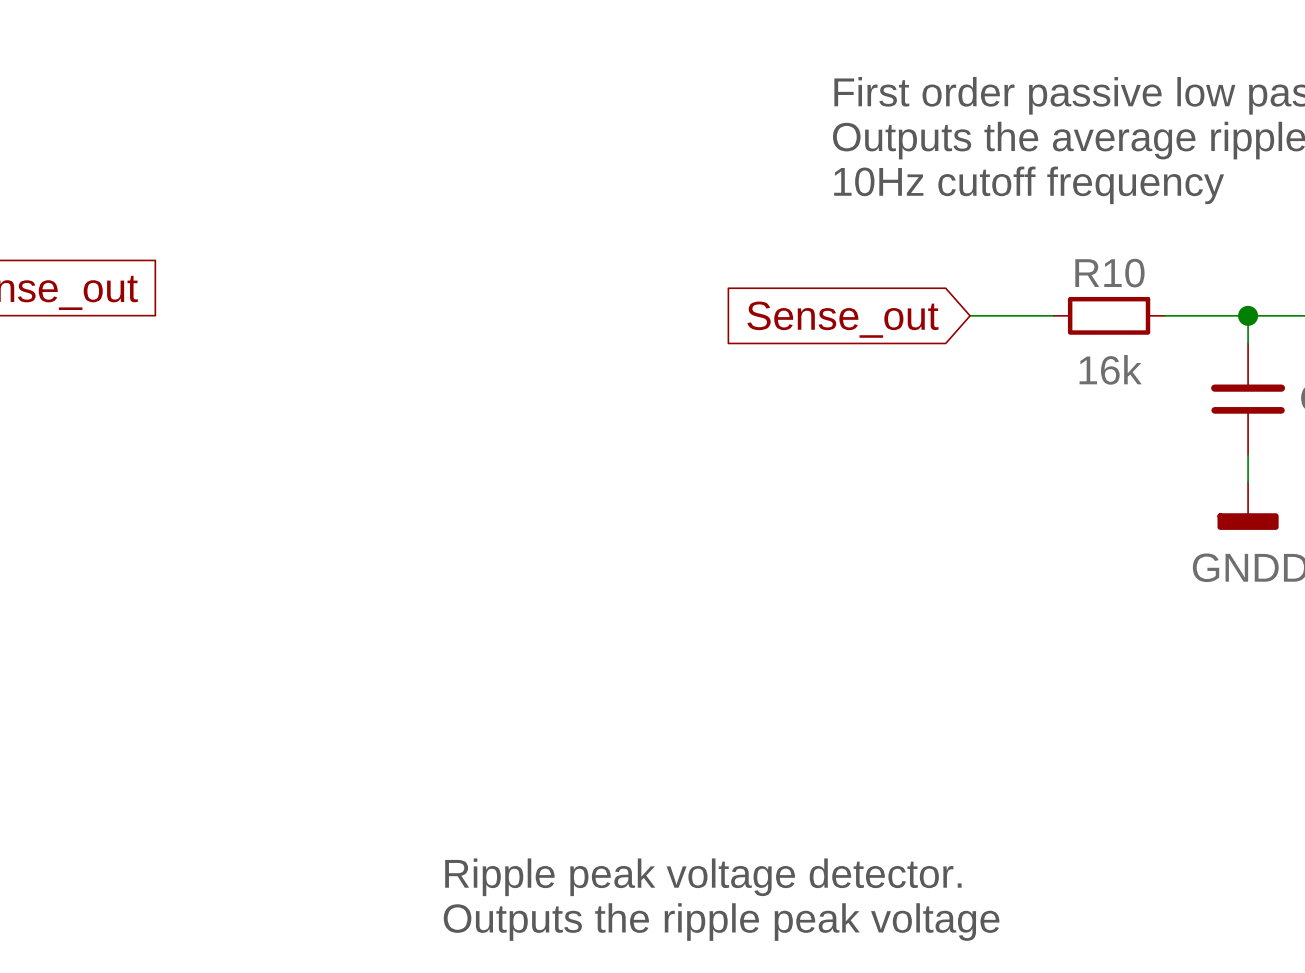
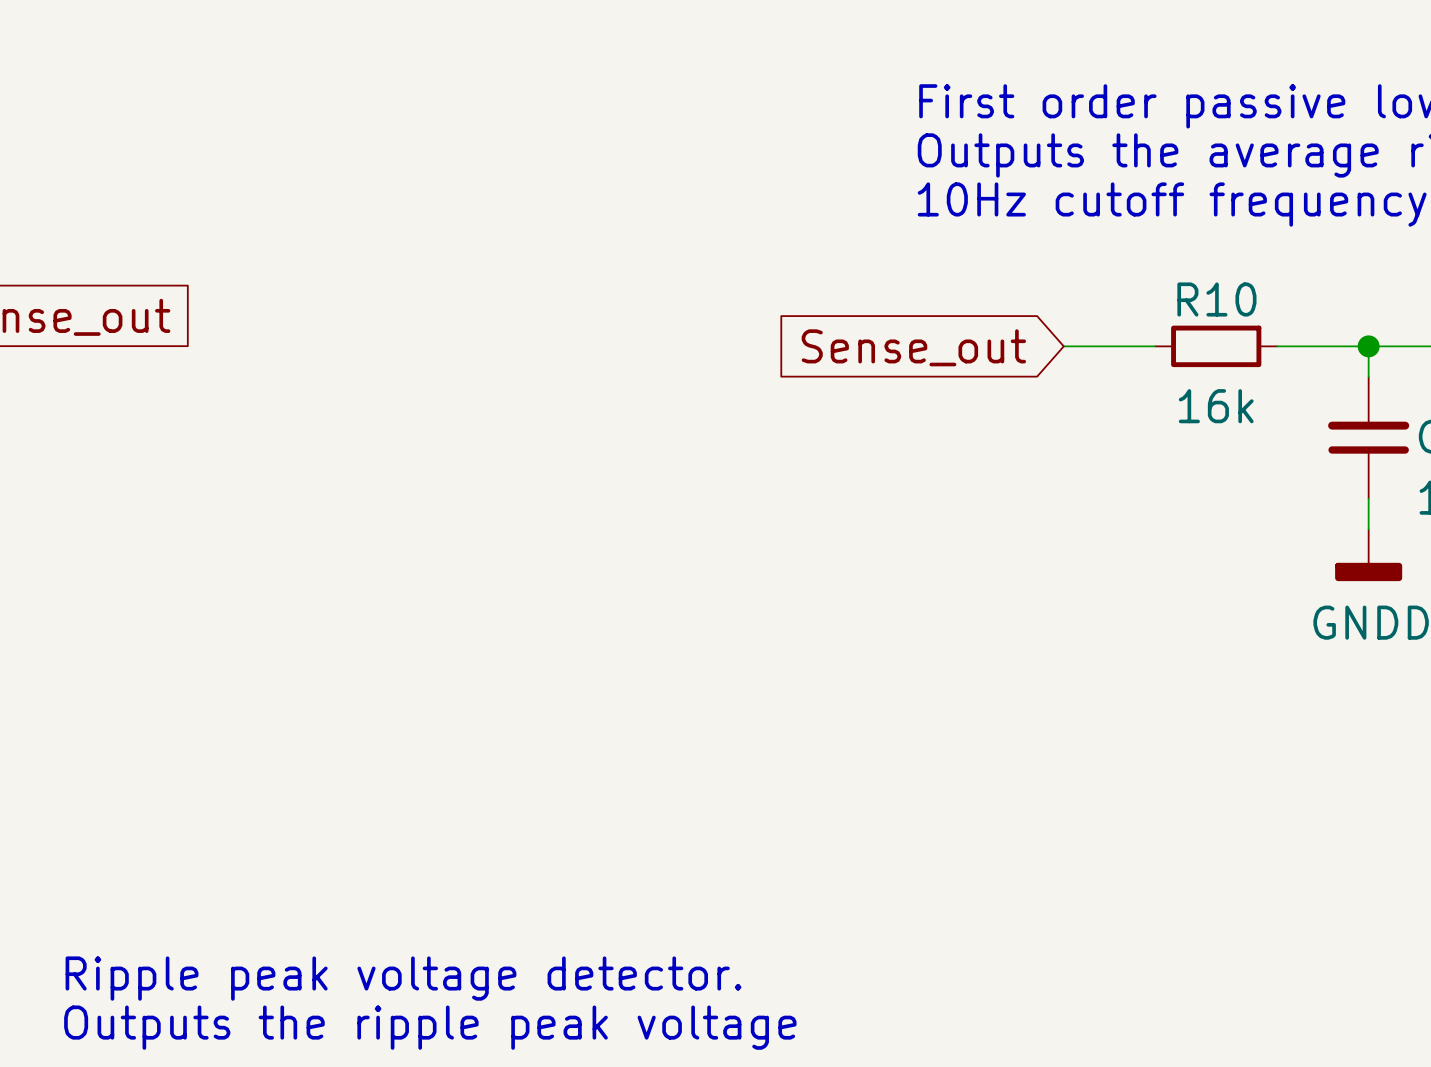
text position: Ripple peak voltage detector. (703, 877) -> Ripple peak voltage detector. (403, 978)
text position: Outputs the ripple peak voltage (721, 922) -> Outputs the ripple peak voltage (430, 1027)

